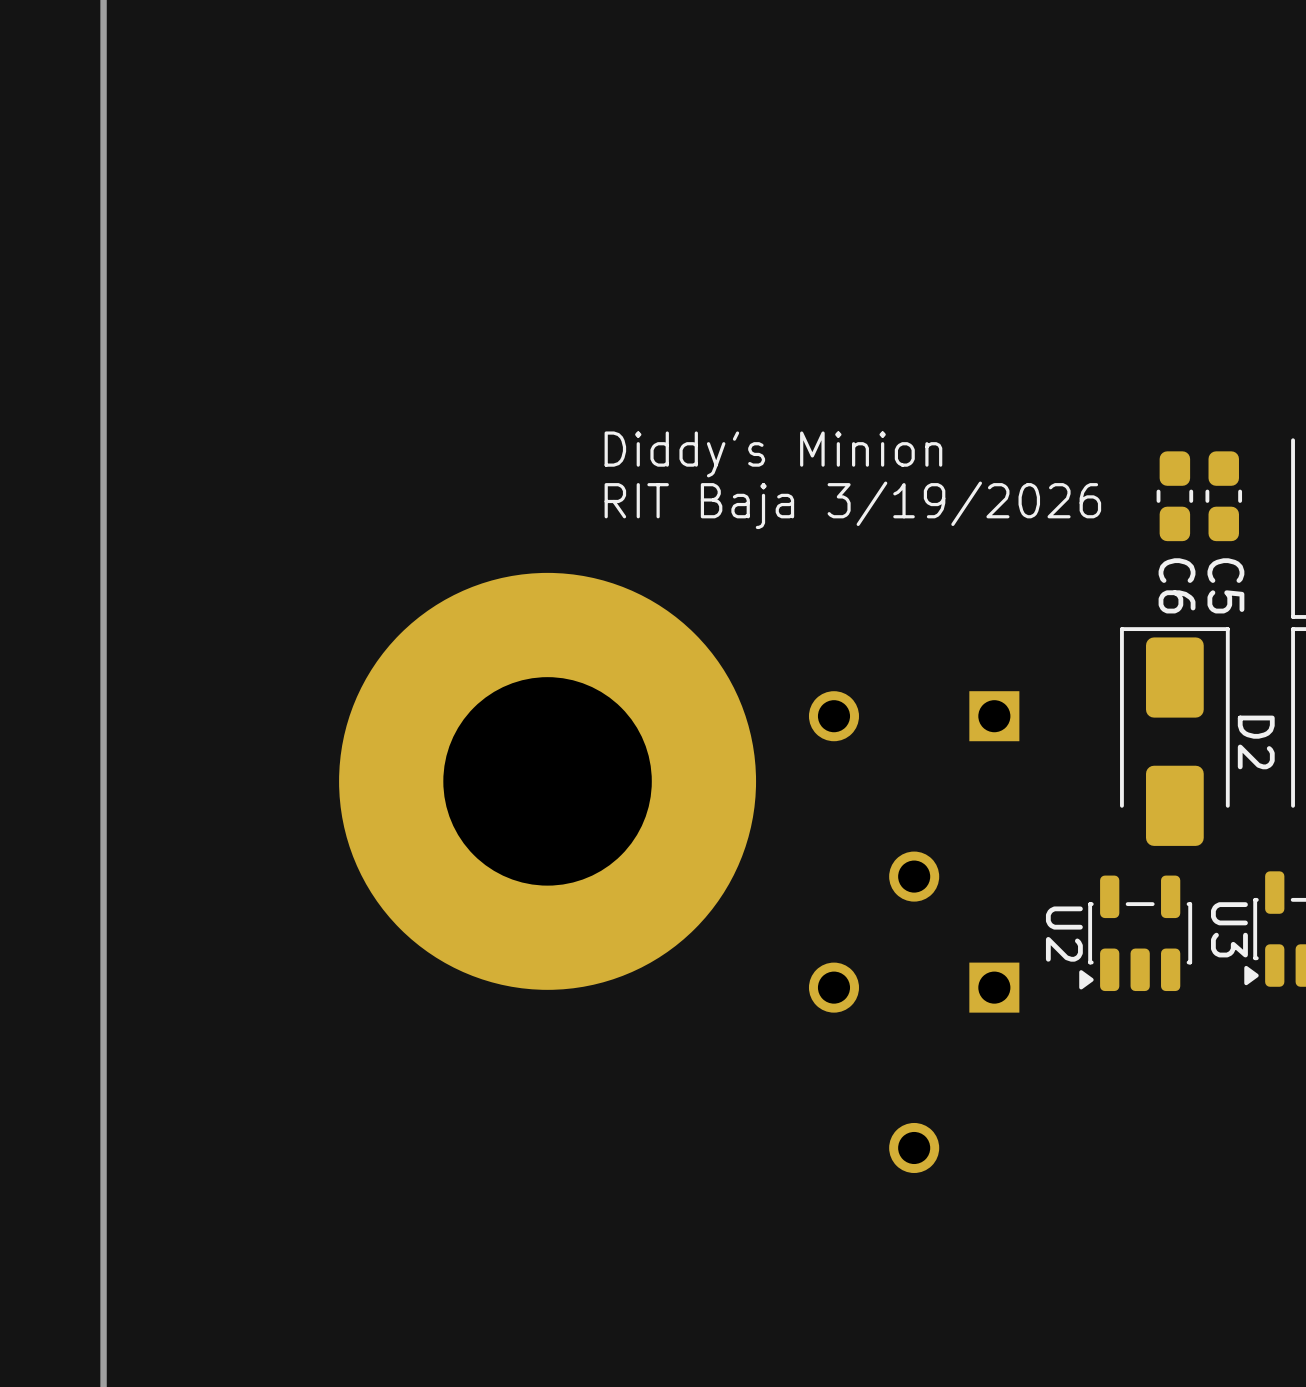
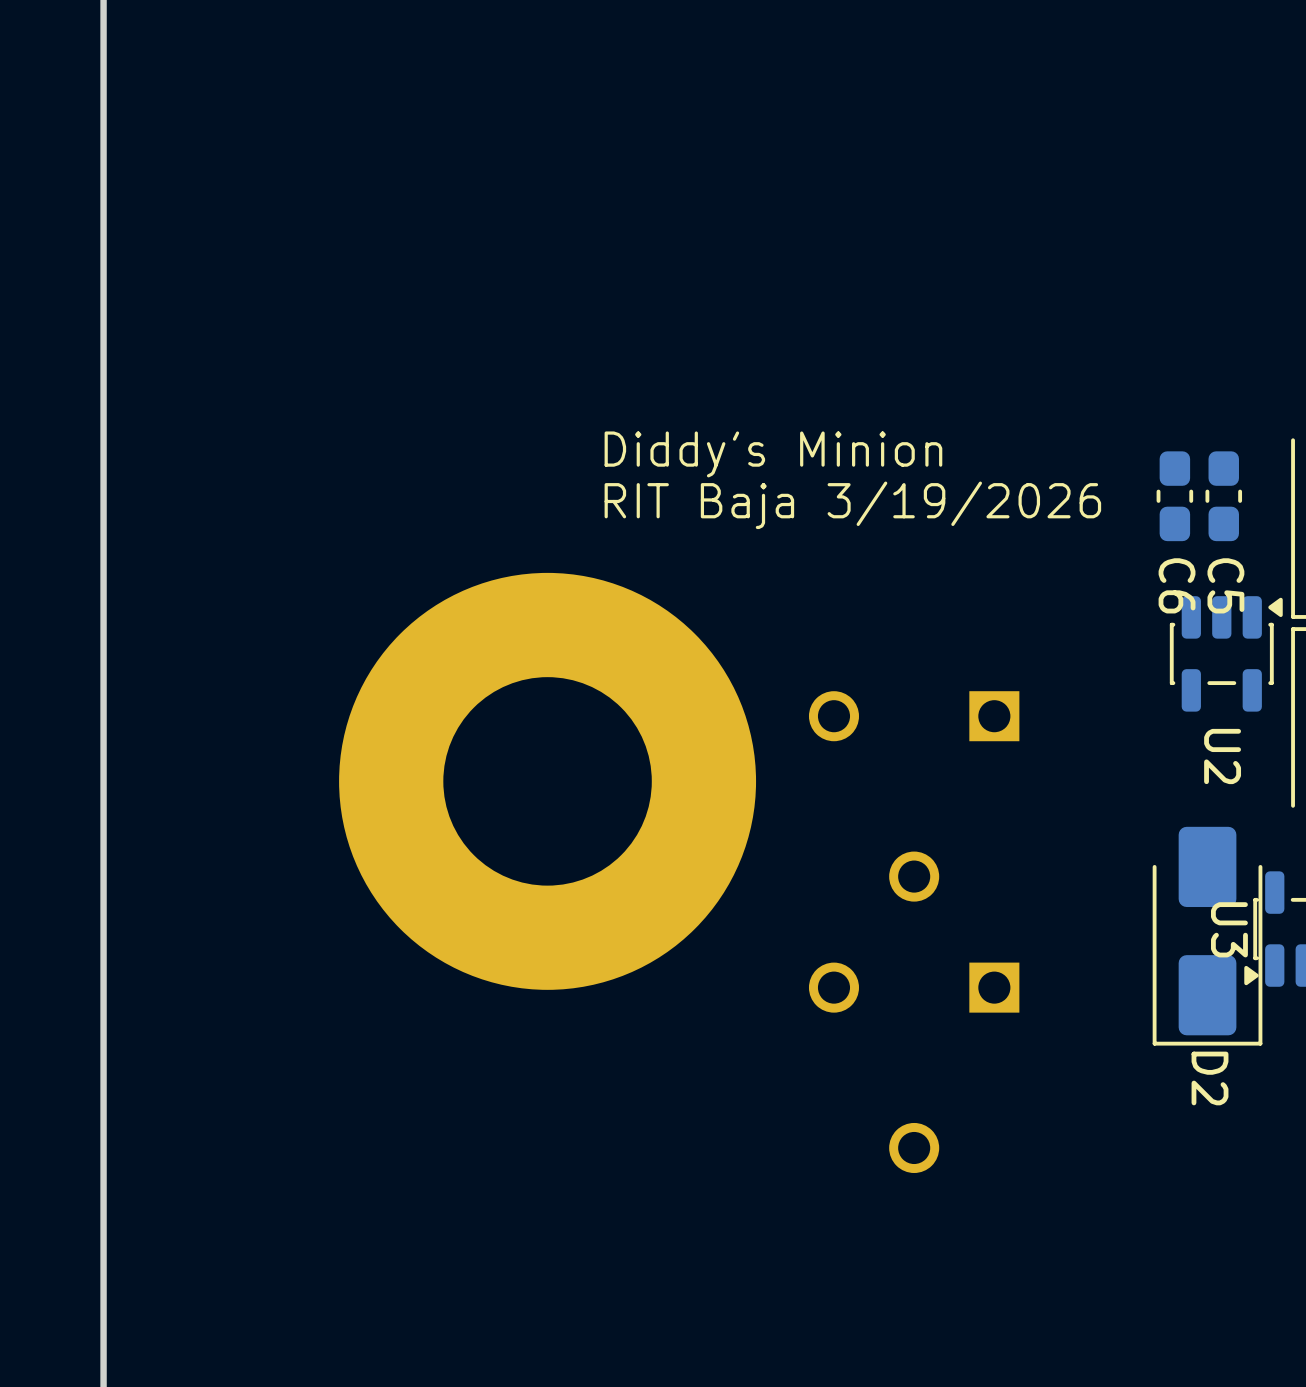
D2 rotation: 0° (1174, 736) -> 180° (1207, 936)
D2 position: (1174, 736) -> (1207, 936)
D2 name position: D2 (1256, 742) -> D2 (1210, 1078)
U2 rotation: 0° (1135, 933) -> 180° (1226, 653)
U2 position: (1135, 933) -> (1226, 653)
U2 name position: U2 (1064, 934) -> U2 (1222, 756)

